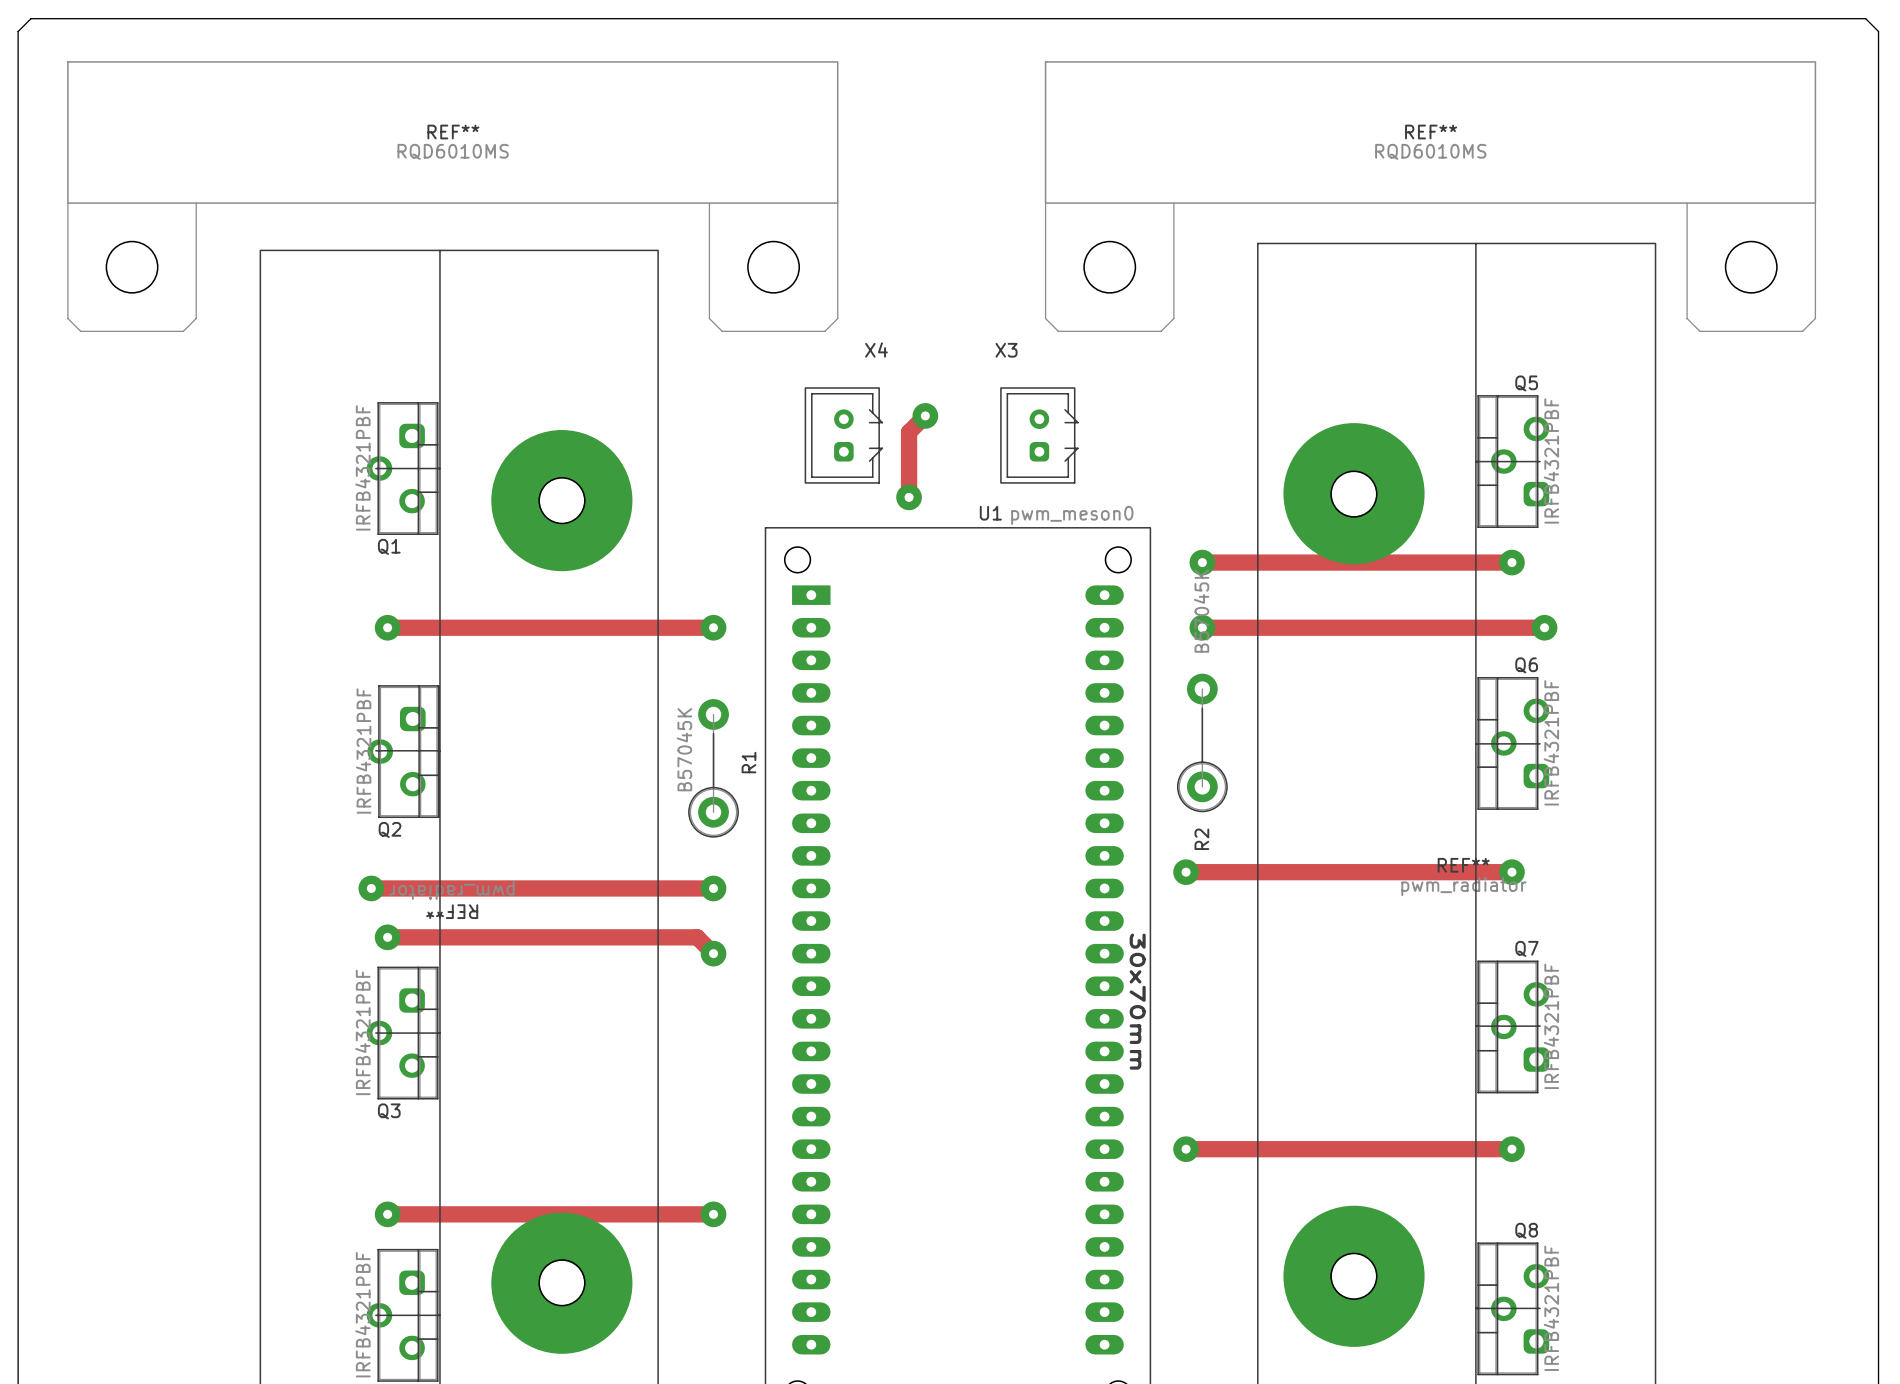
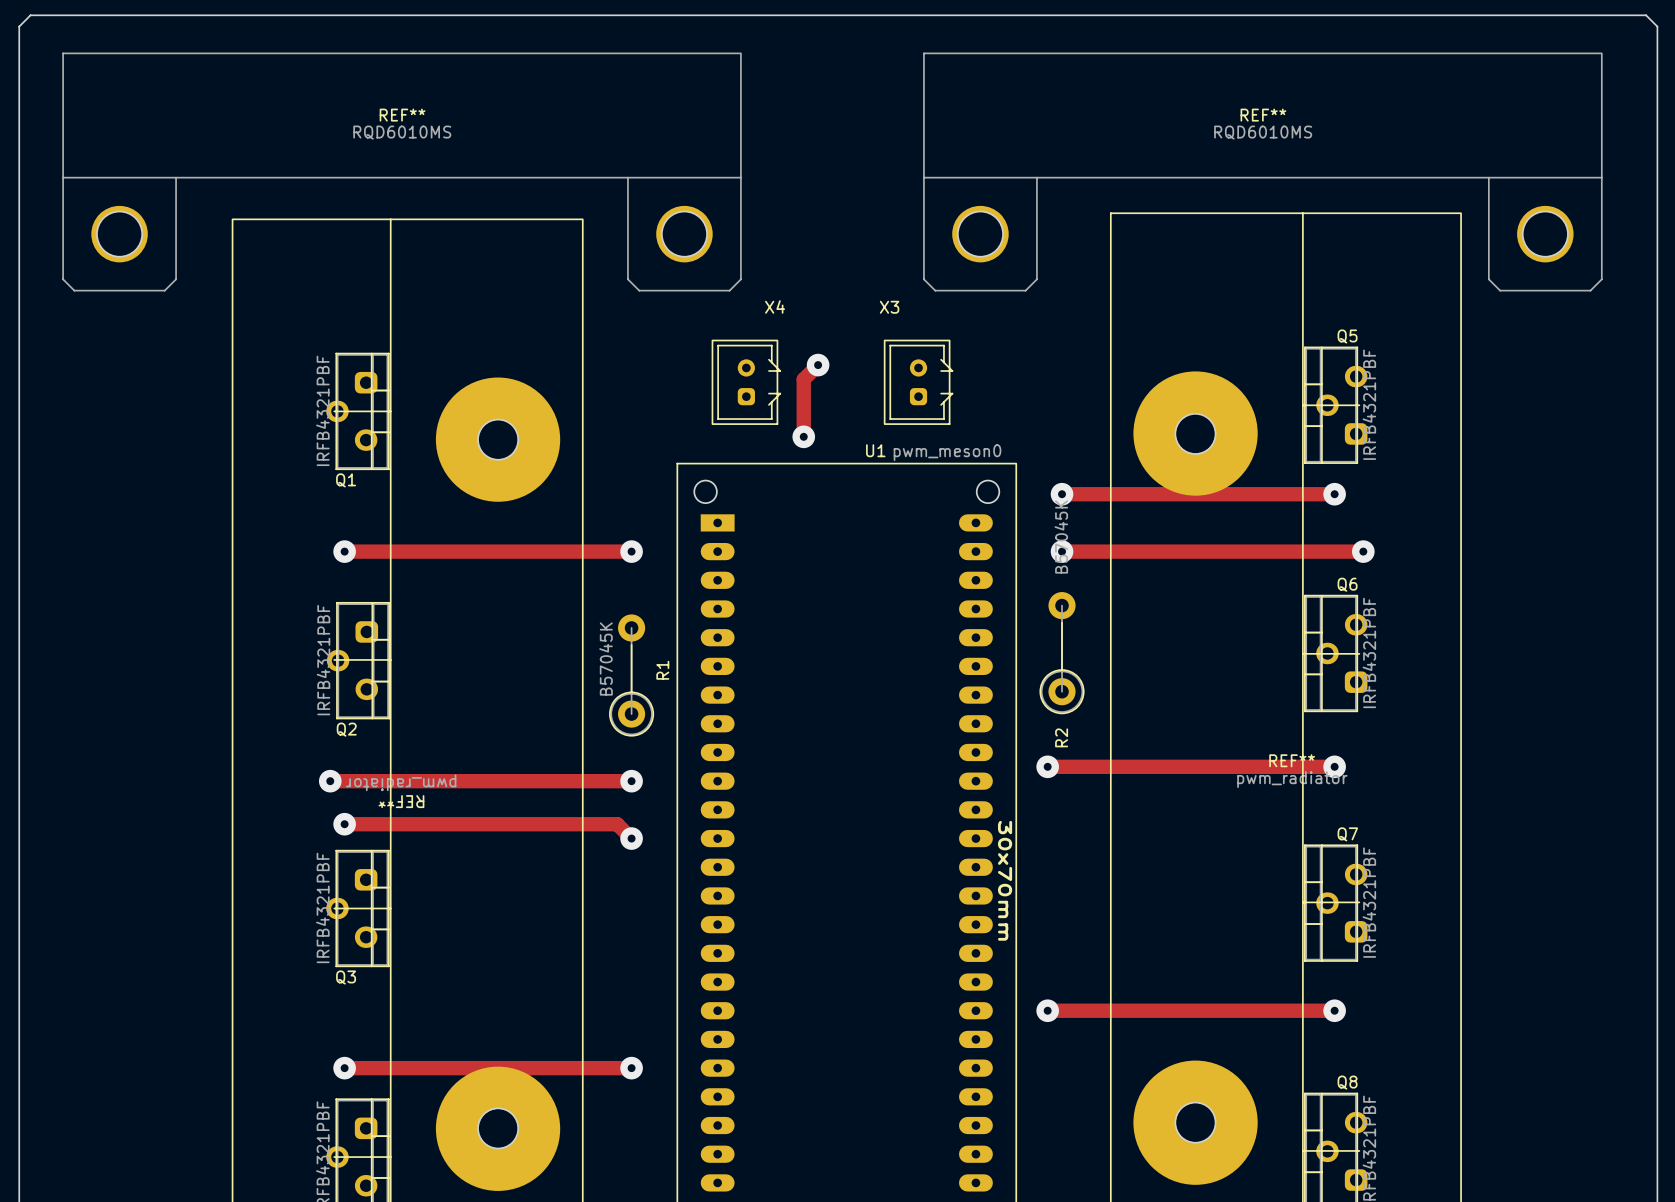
REF** footprint: [67, 61, 839, 333] -> [62, 52, 742, 292]
REF** footprint: [1044, 61, 1817, 333] -> [923, 52, 1603, 292]

